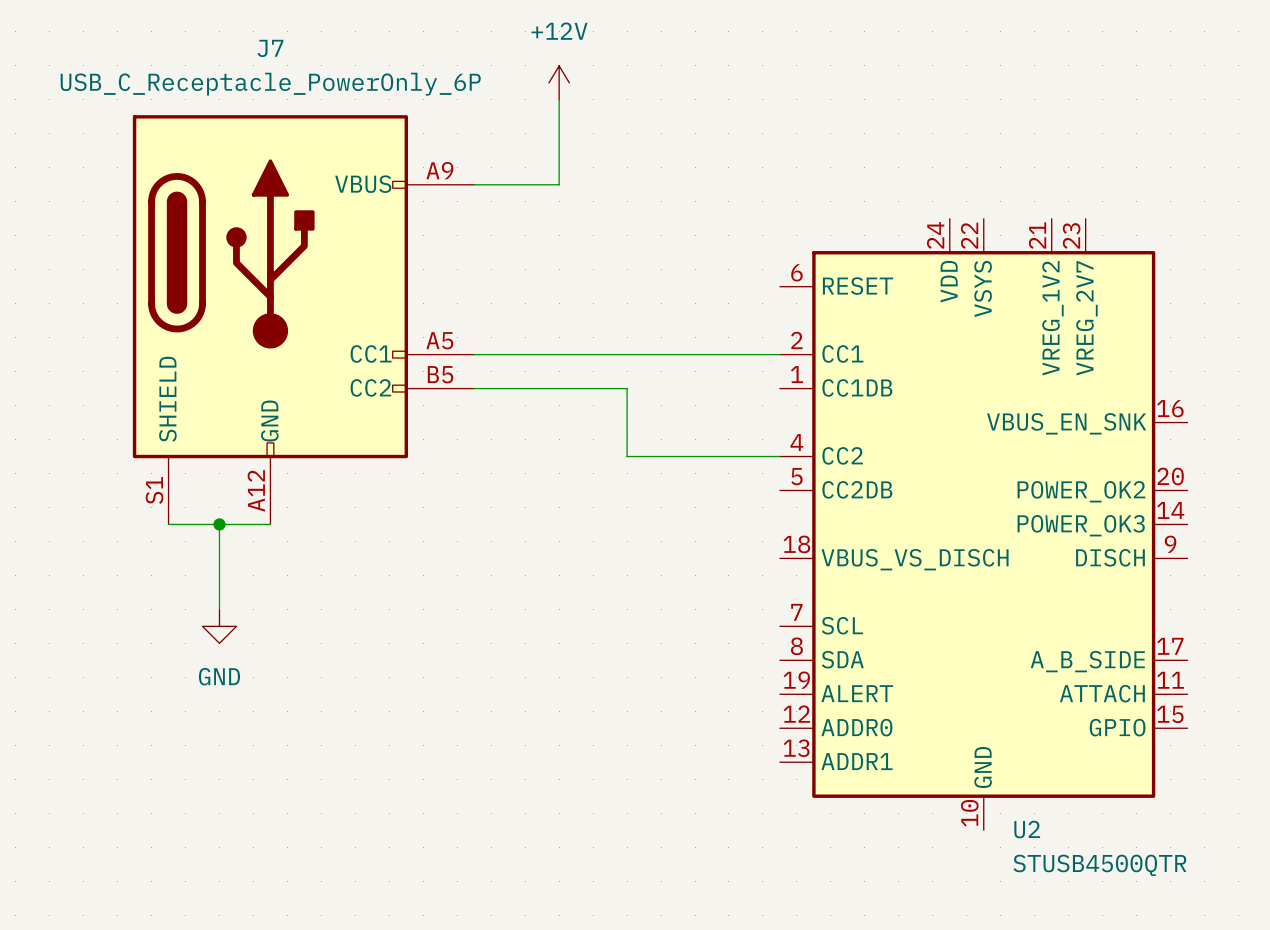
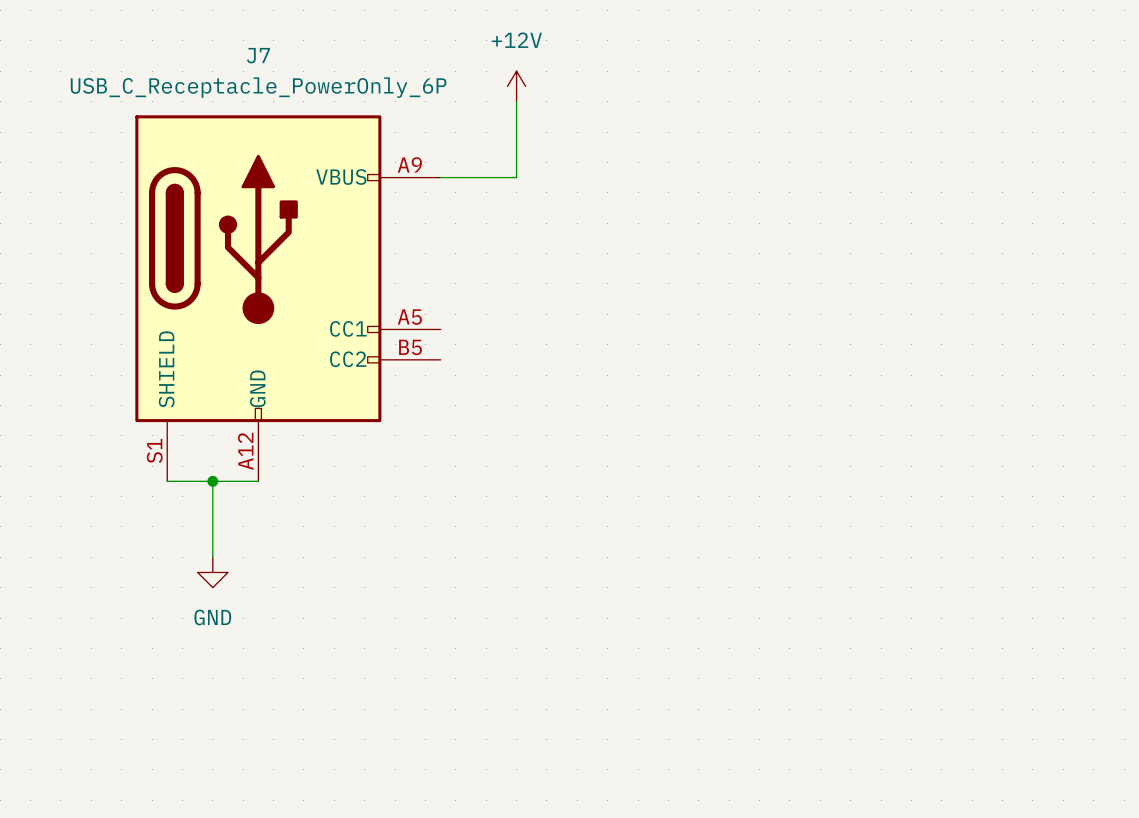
wire: (474, 354) (779, 354) -> none
wire: (474, 388) (627, 388) (627, 456) (779, 456) -> none
U2: STUSB4500QTR (983, 524) -> none

